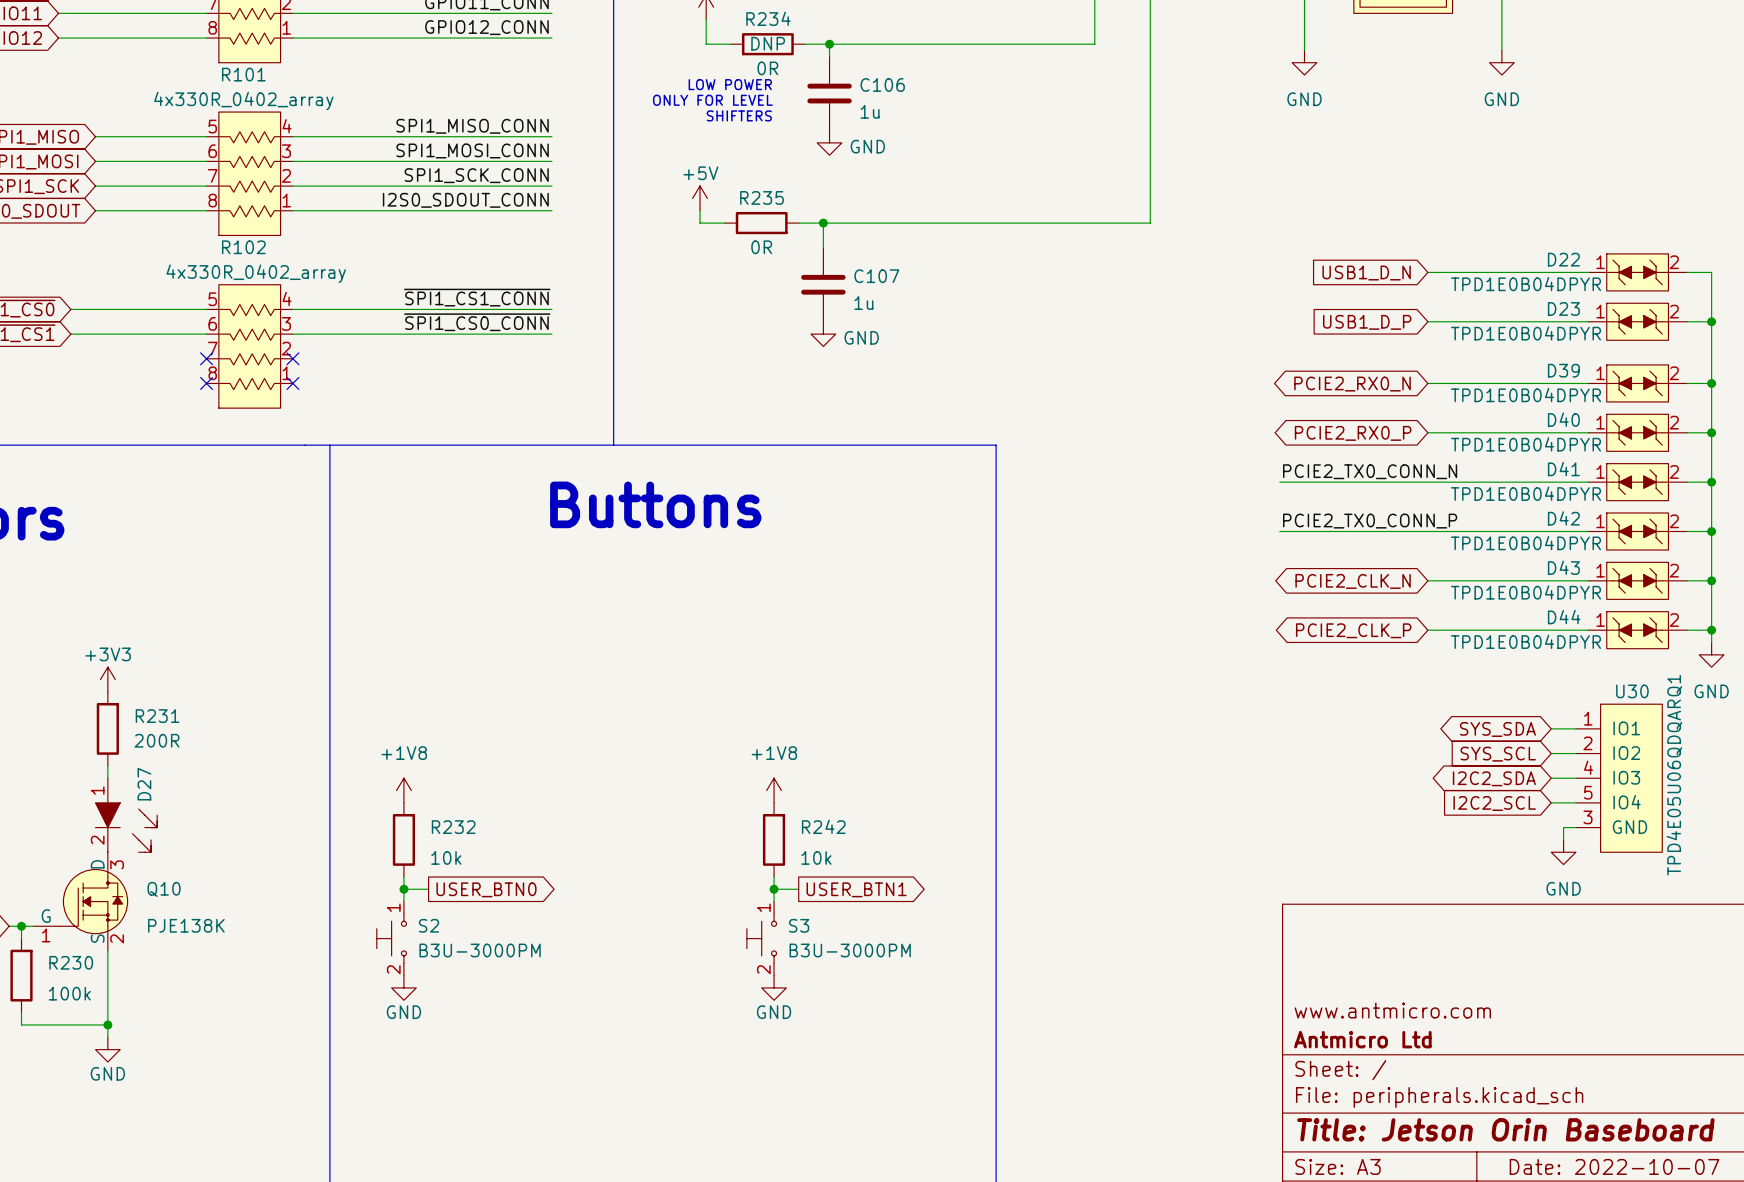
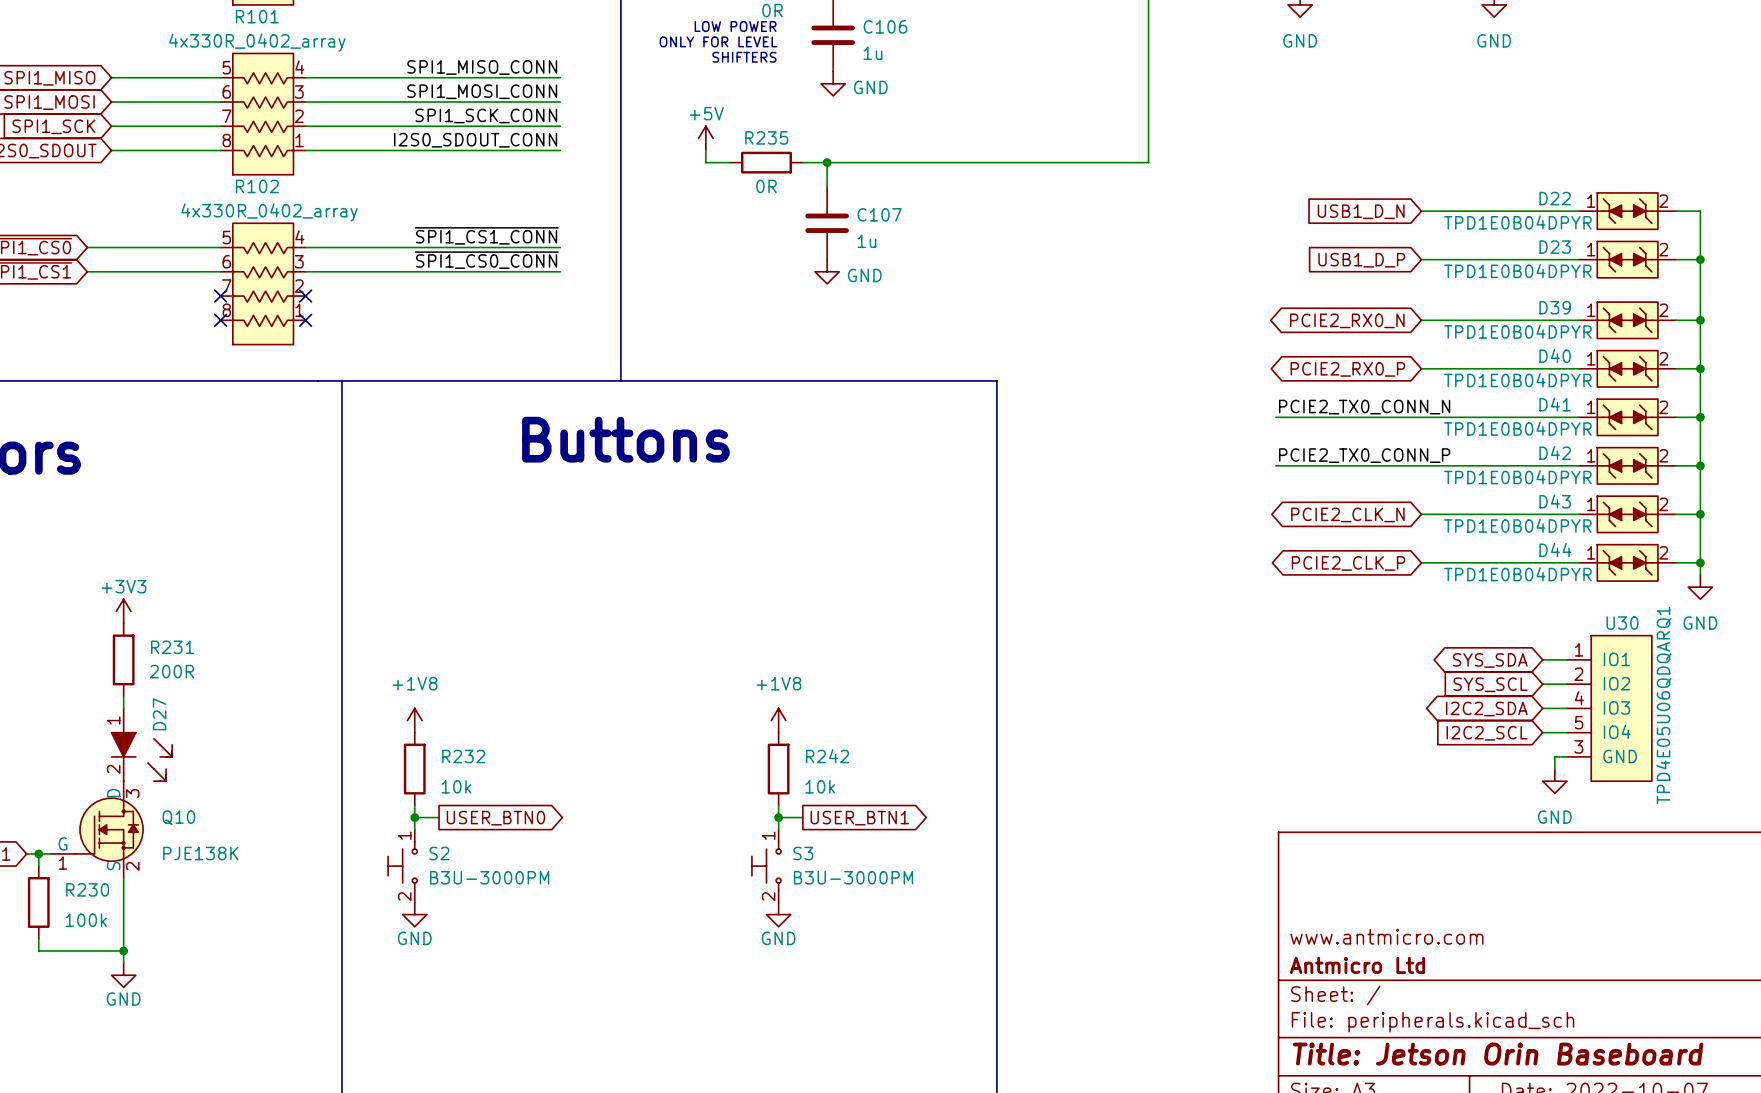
text position: Buttons (655, 504) -> Buttons (625, 439)

